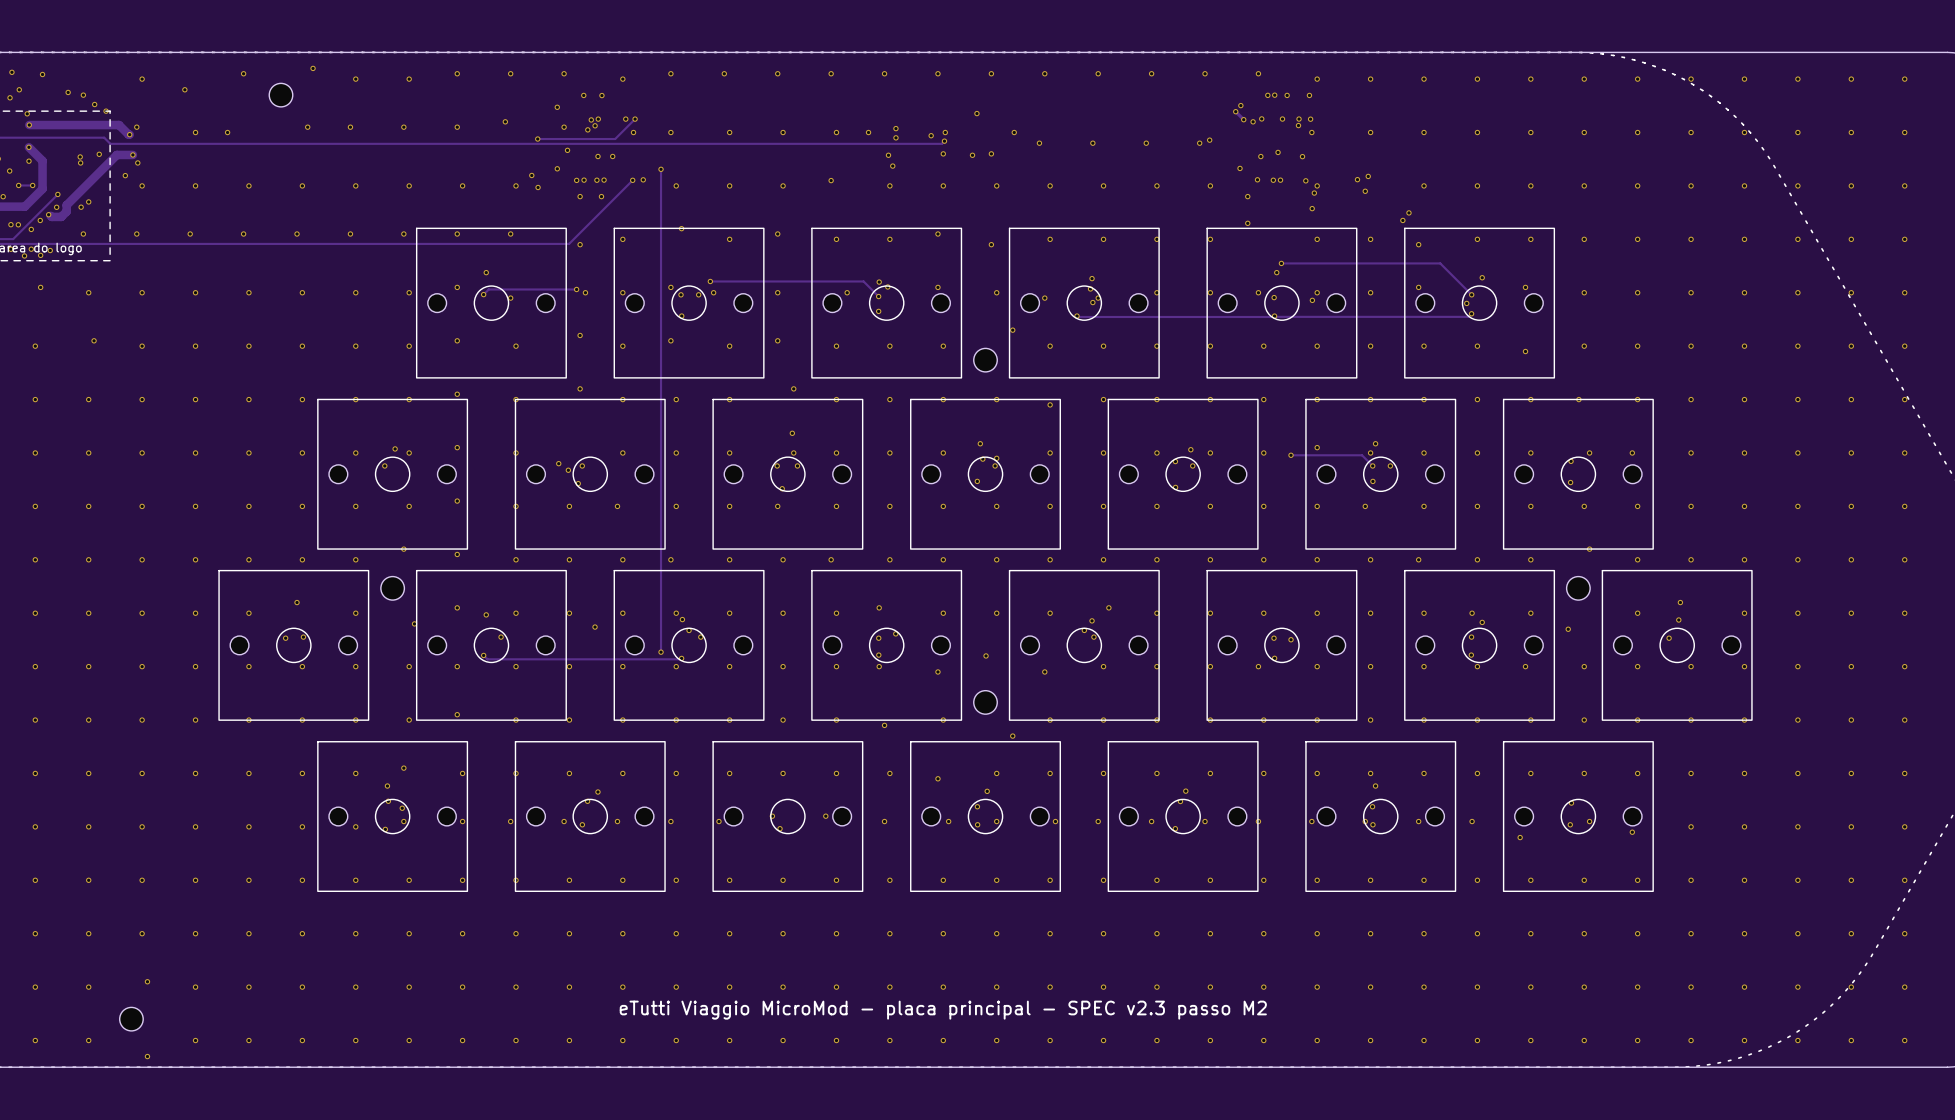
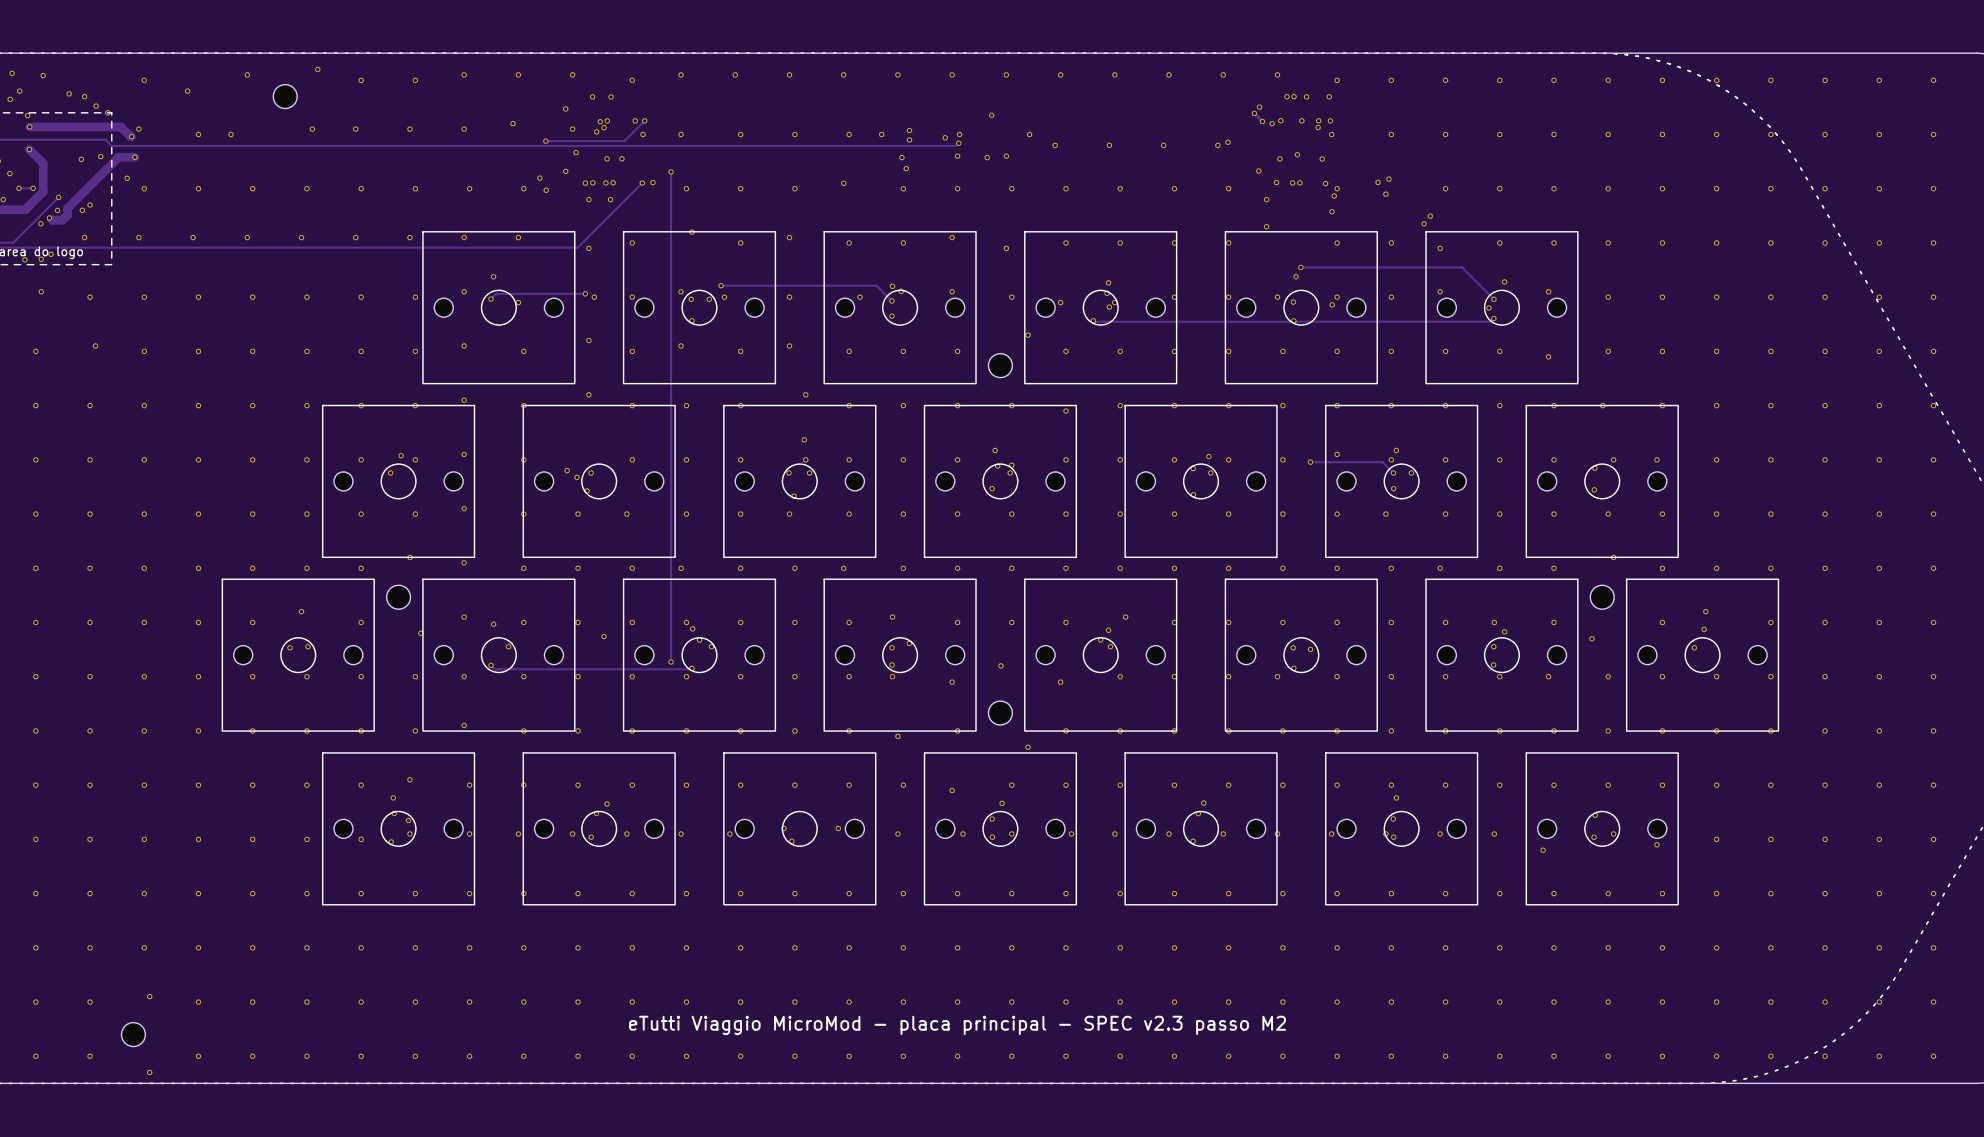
via: (28, 161) -> none
via: (80, 162) -> none
via: (137, 162) -> none
via: (10, 224) -> none
via: (18, 224) -> none
via: (31, 229) -> none
via: (10, 249) -> none
via: (31, 249) -> none

